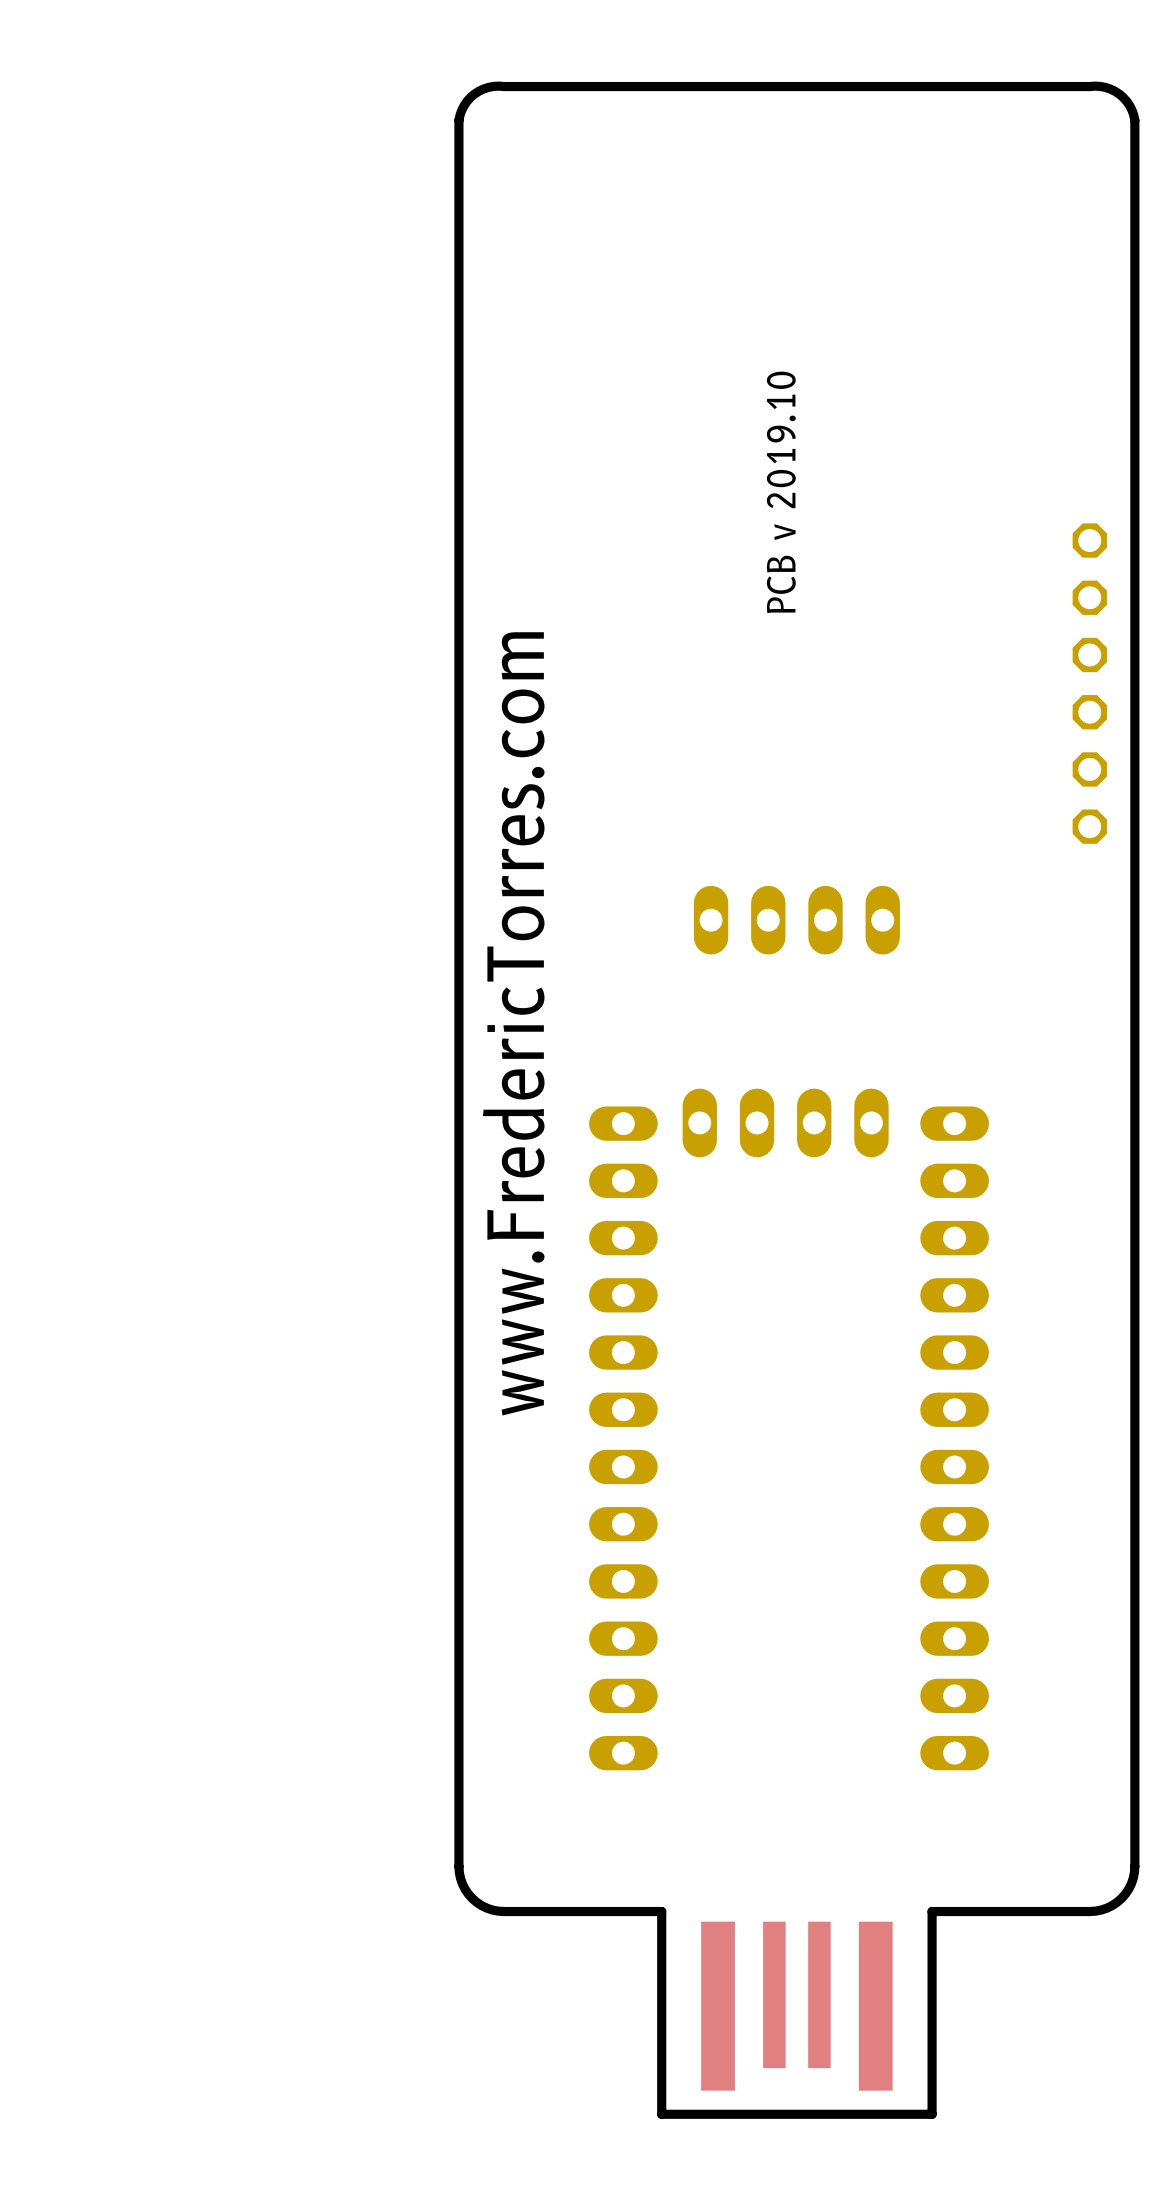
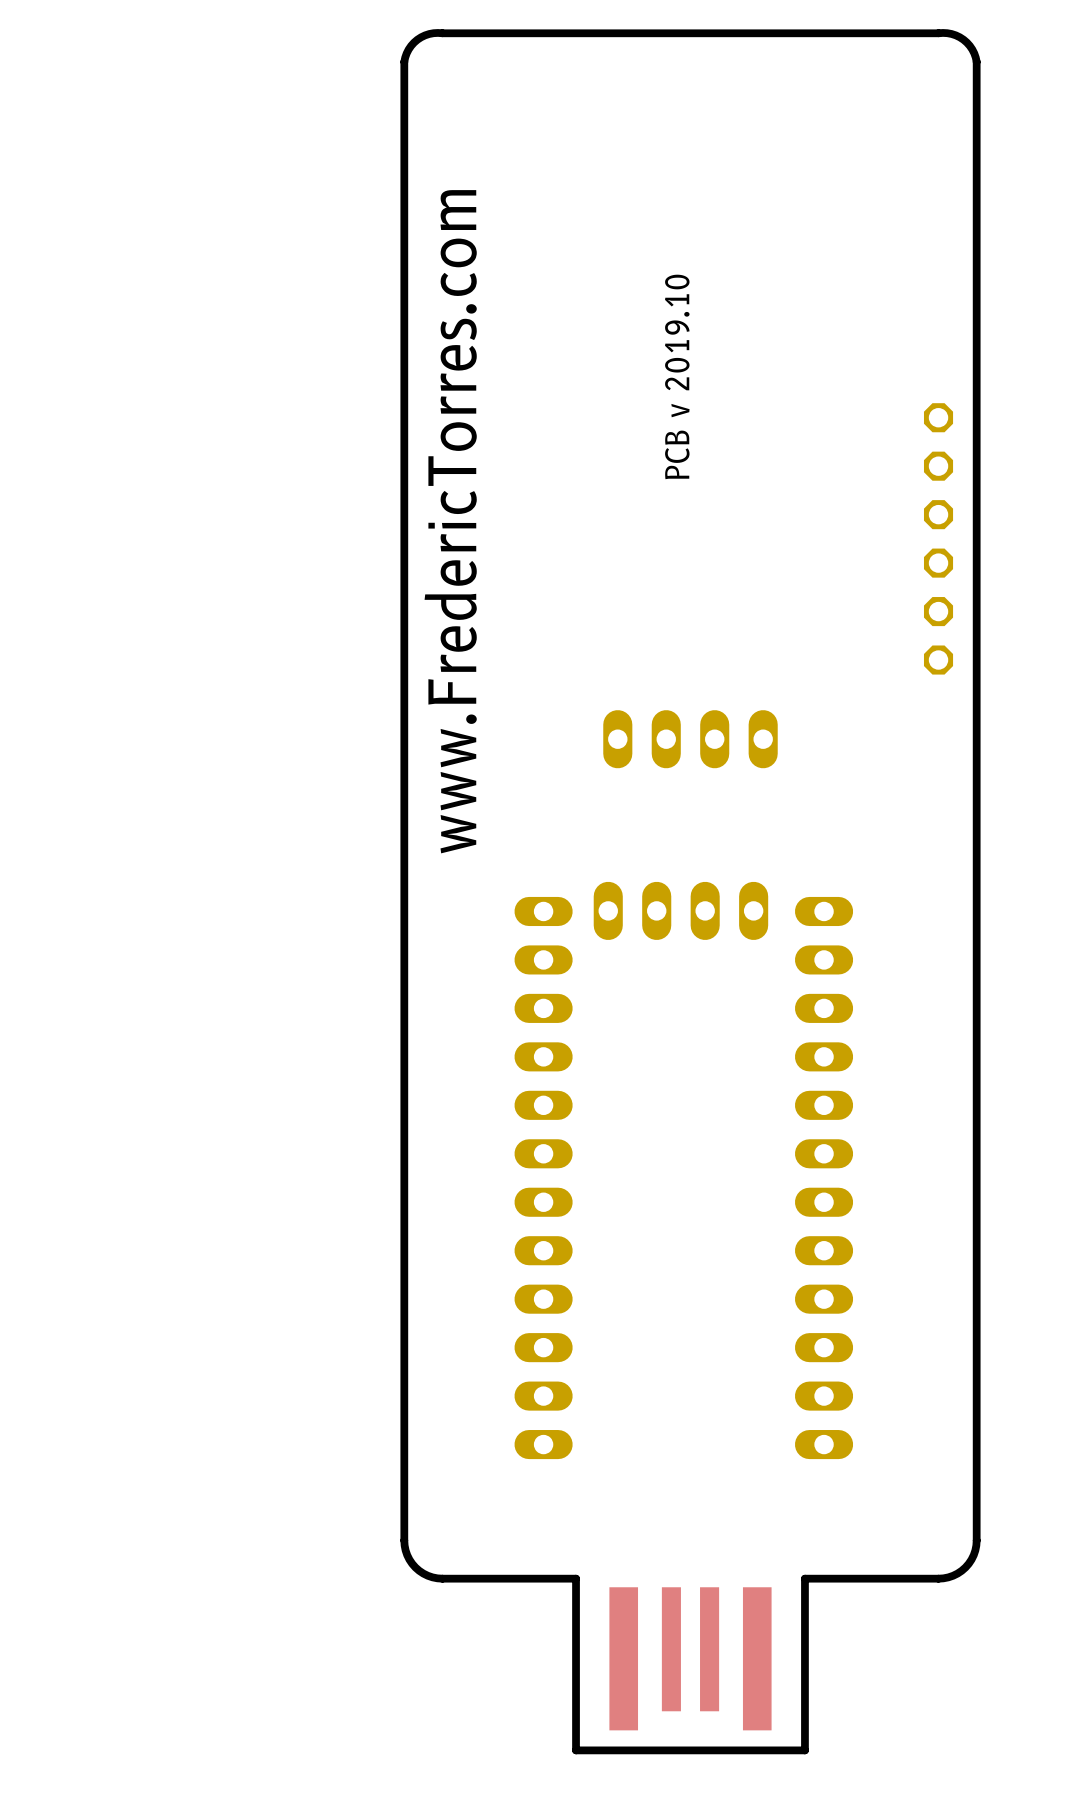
text position: www.FredericTorres.com (513, 1023) -> www.FredericTorres.com (450, 521)

